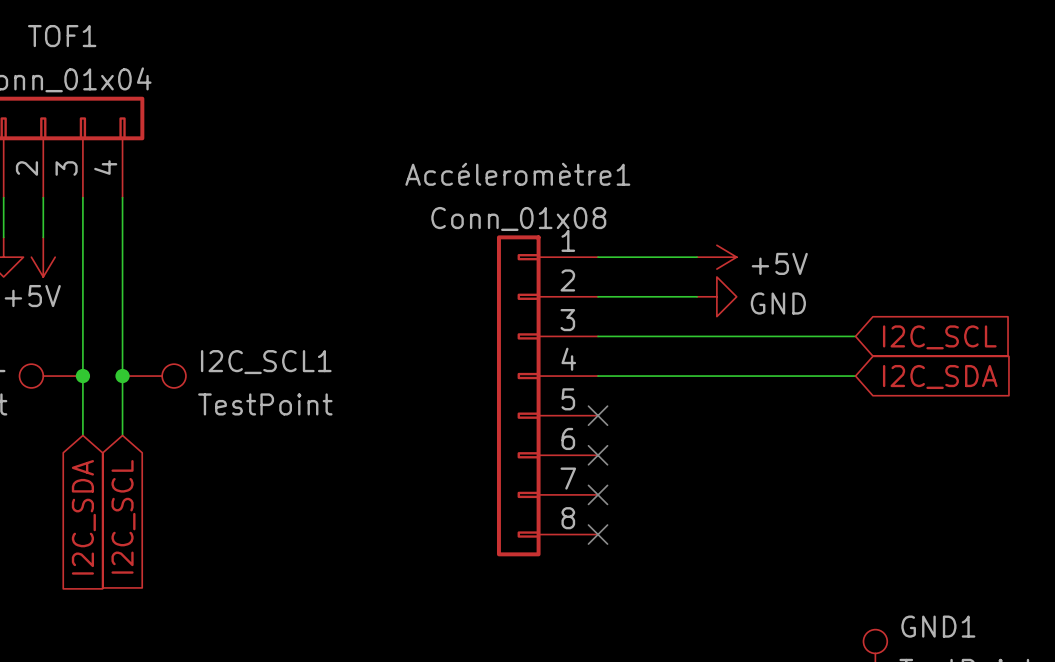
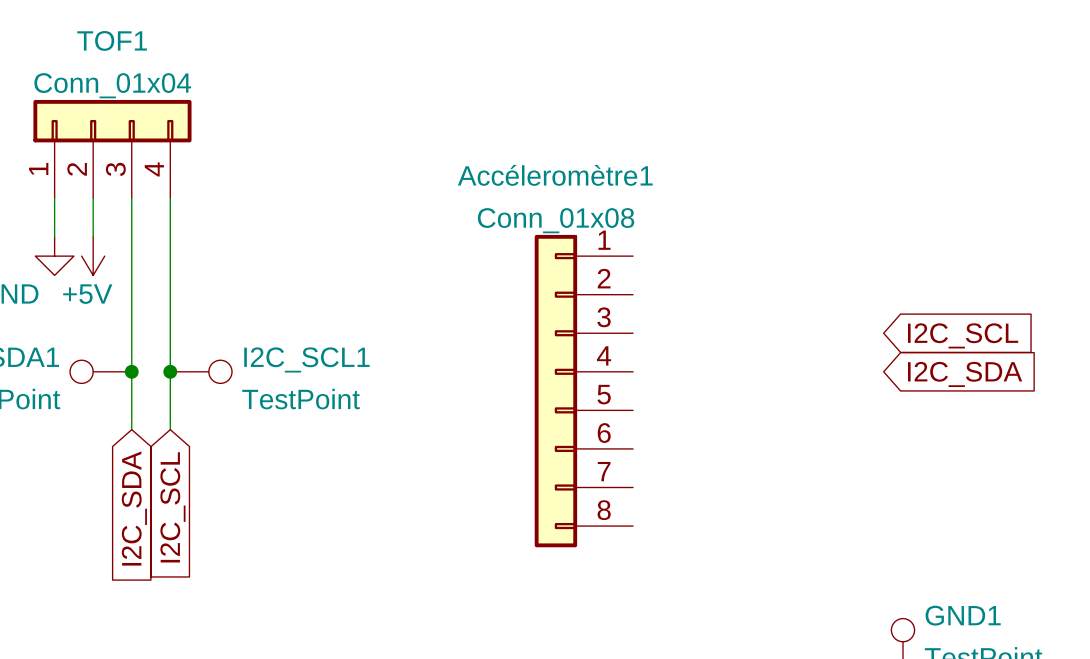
wire: (598, 257) (697, 257) -> none
power symbol: +5V (716, 257) -> none
wire: (598, 296) (697, 296) -> none
power symbol: GND (716, 296) -> none
wire: (598, 336) (855, 336) -> none
wire: (598, 376) (855, 376) -> none
no-connect mark: (598, 415) -> none
no-connect mark: (598, 455) -> none
no-connect mark: (598, 494) -> none
no-connect mark: (598, 534) -> none

